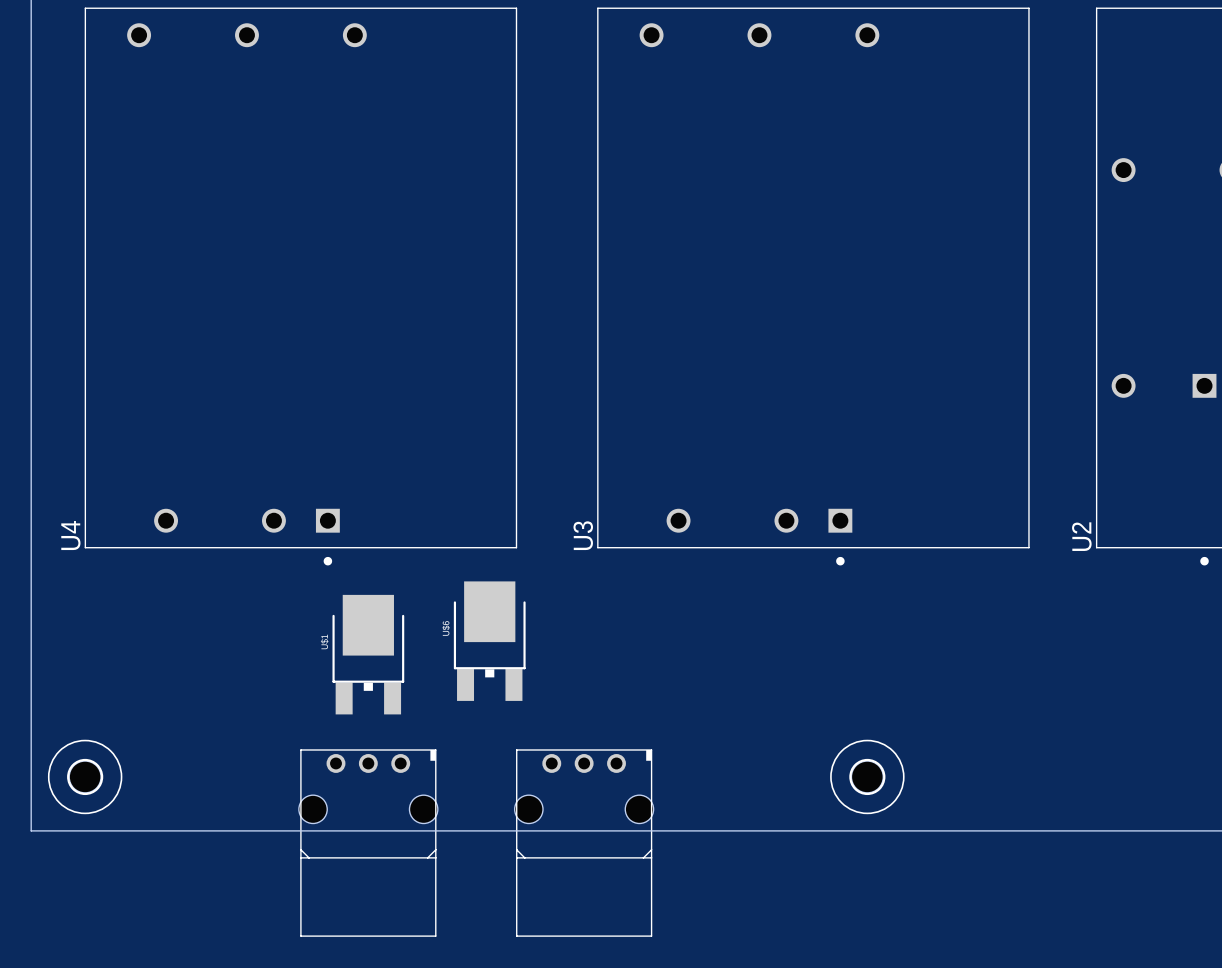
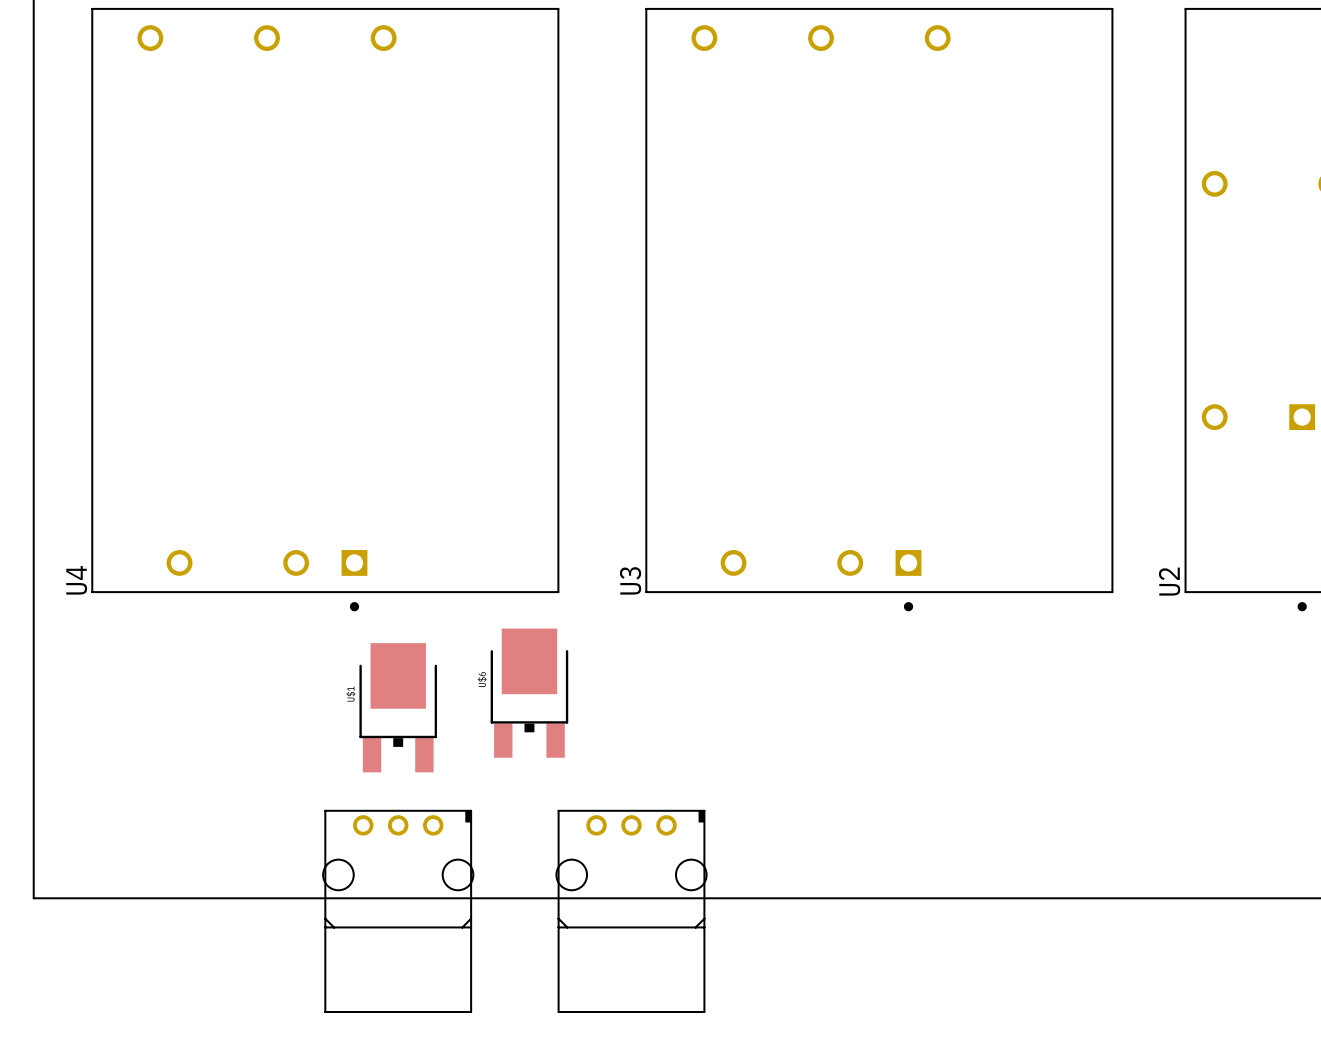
part: (85, 776) -> none
part: (867, 776) -> none

